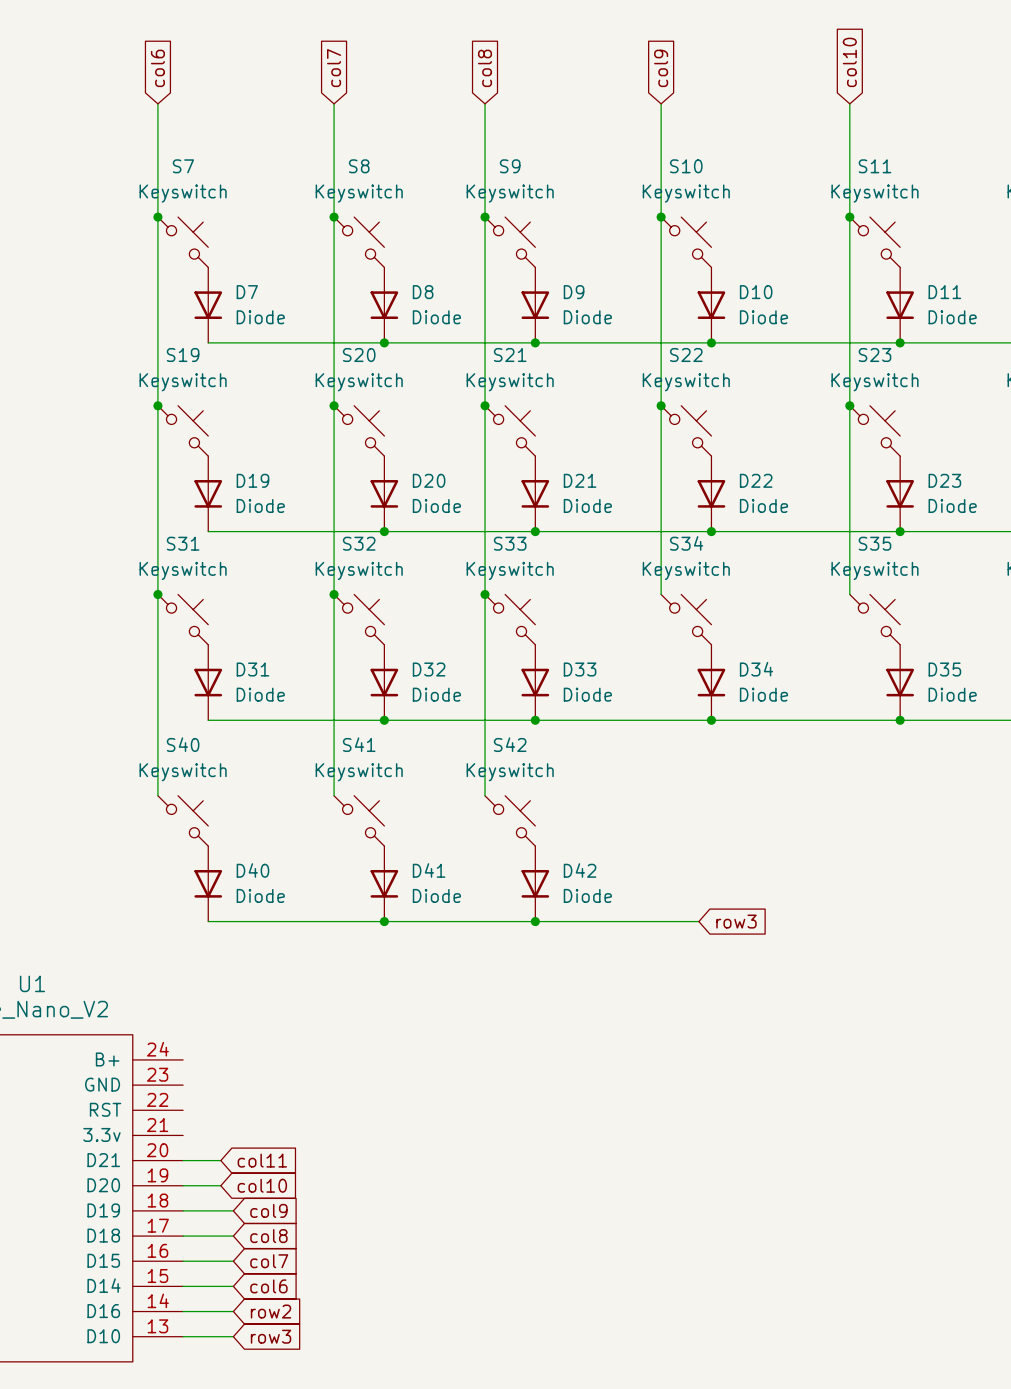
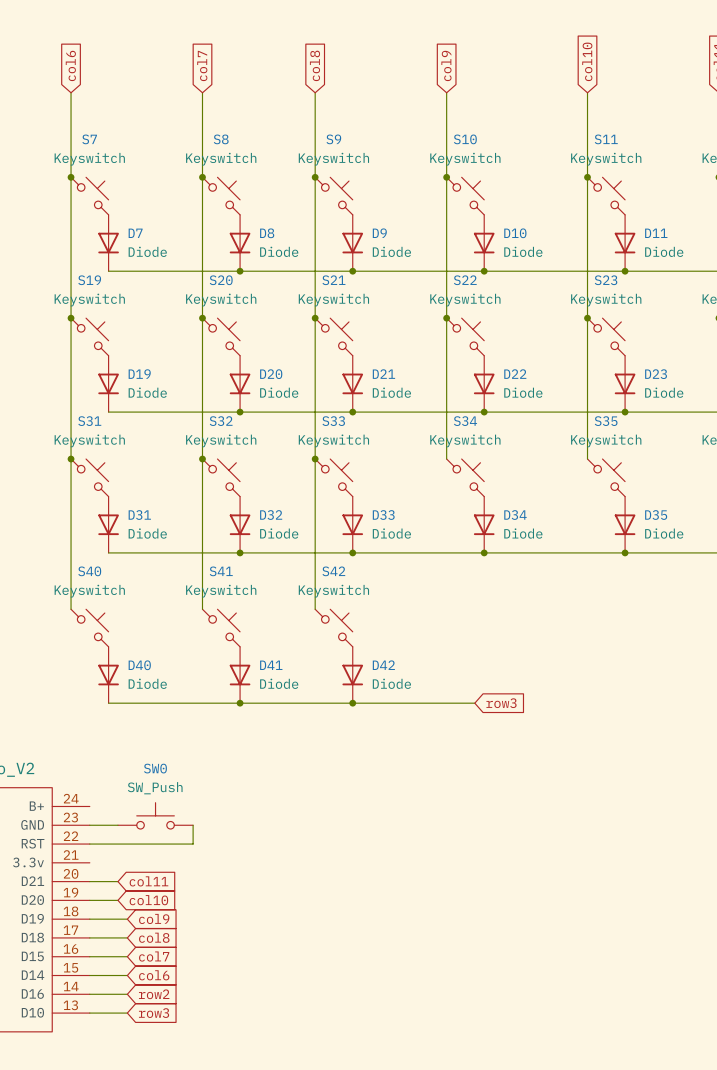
SW0: none -> SW_Push (155, 815)
wire: none -> (89, 825) (117, 825)
wire: none -> (193, 825) (193, 844) (89, 844)

